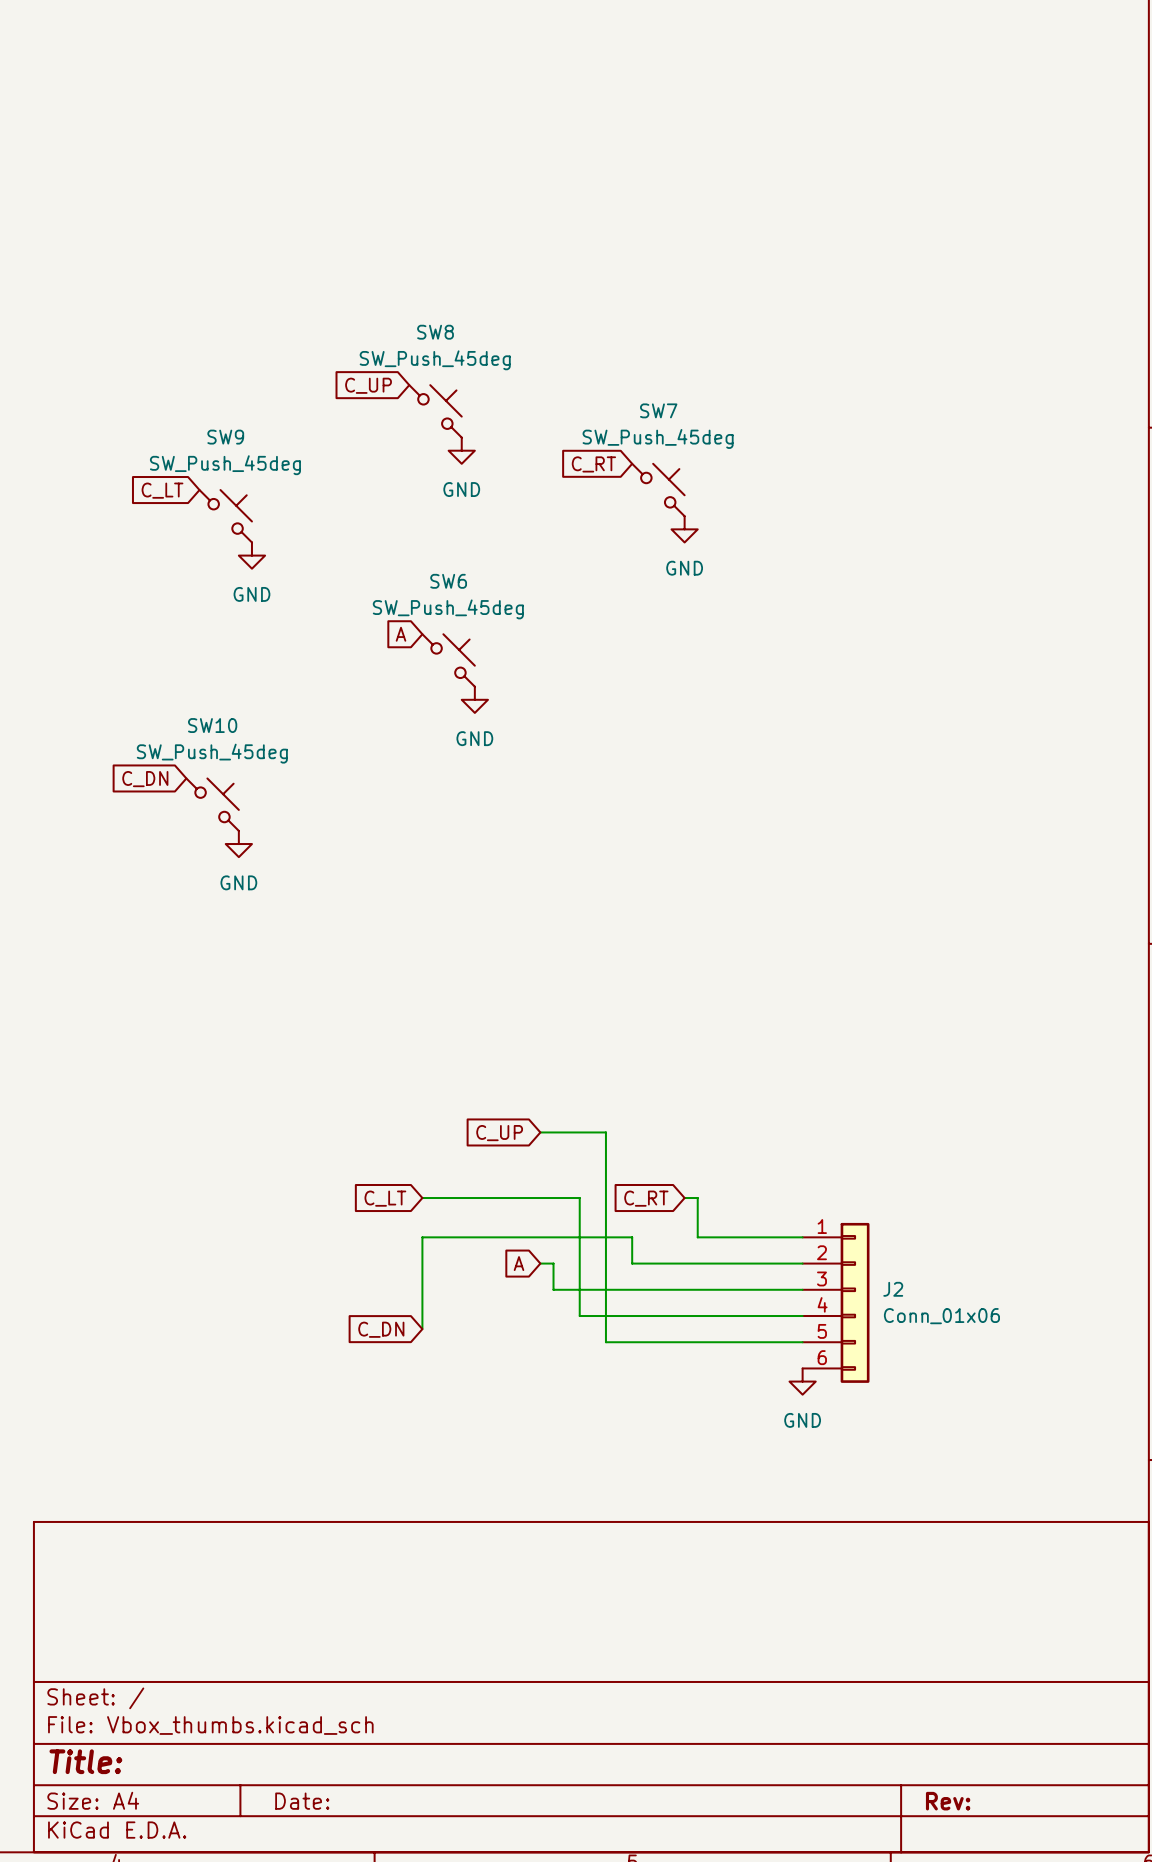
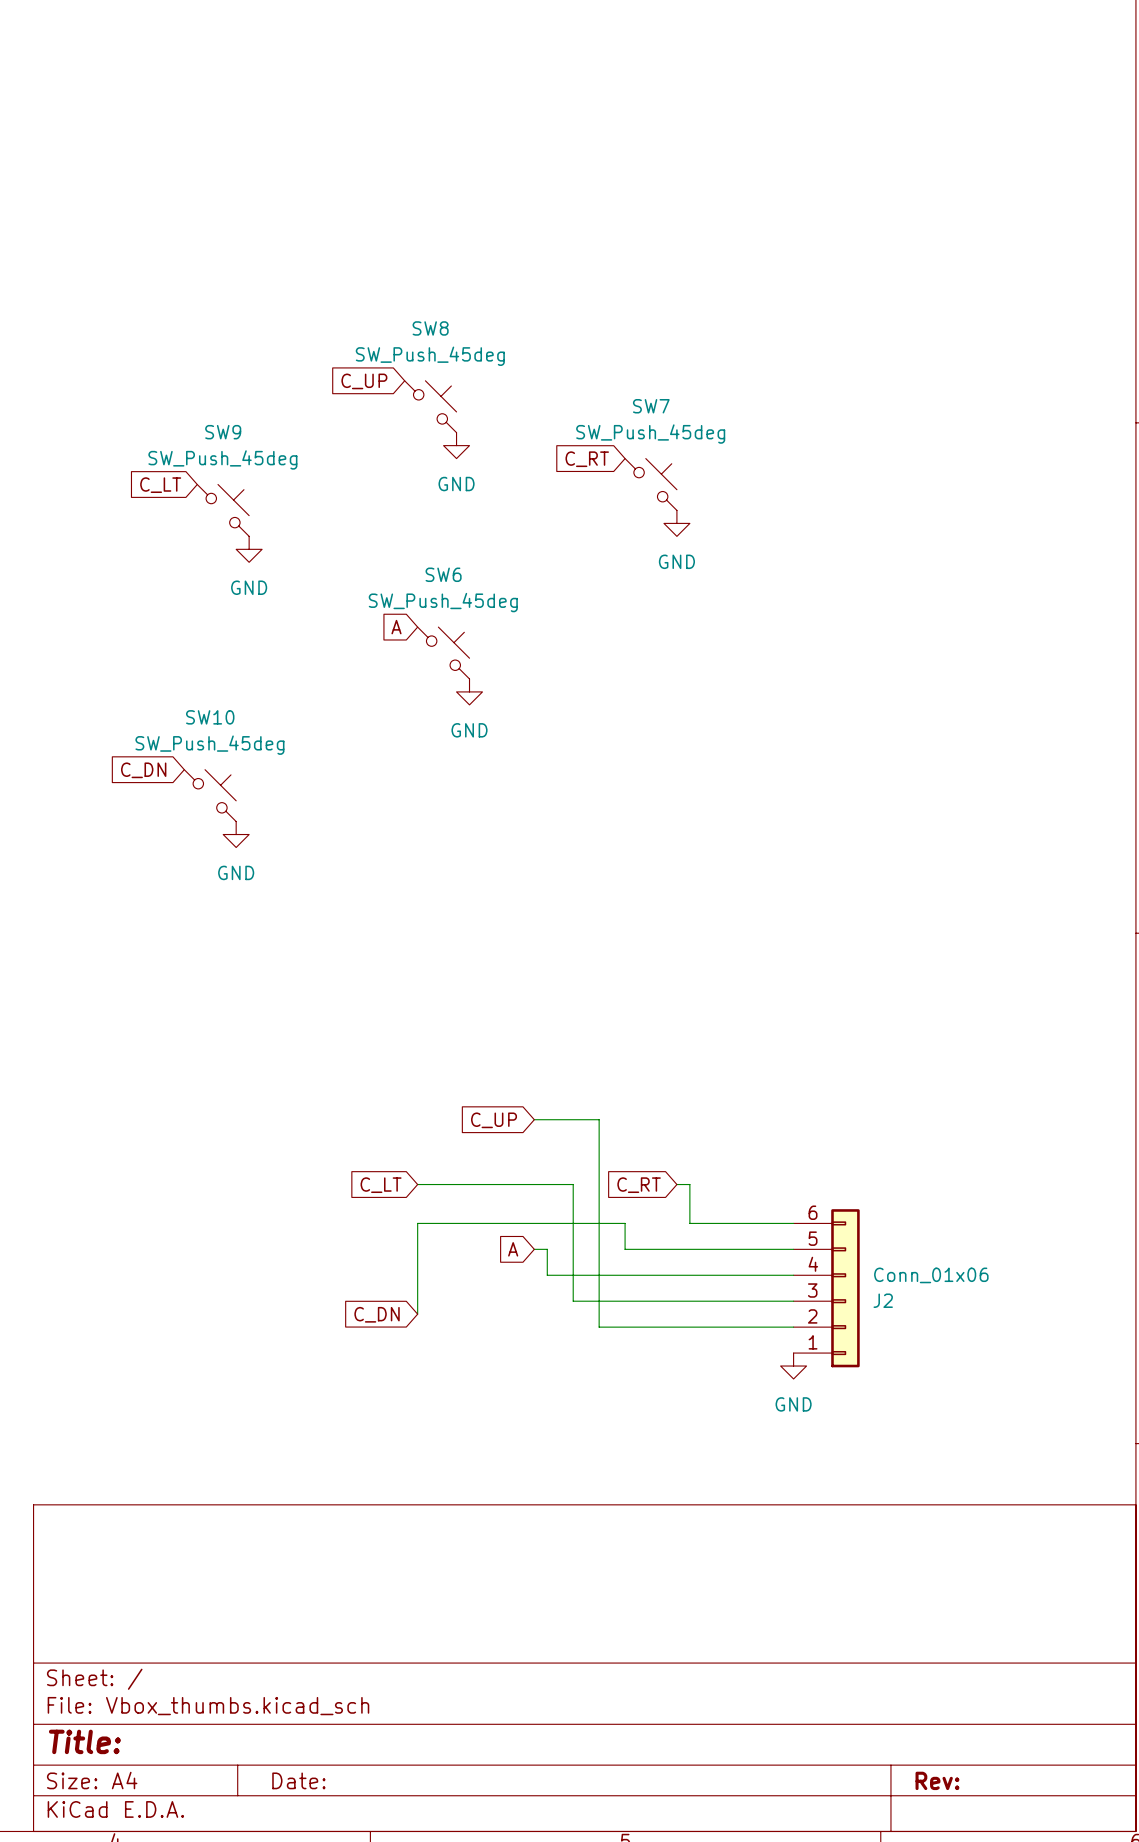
J2 flip: as is (855, 1302) -> up-down (845, 1288)

